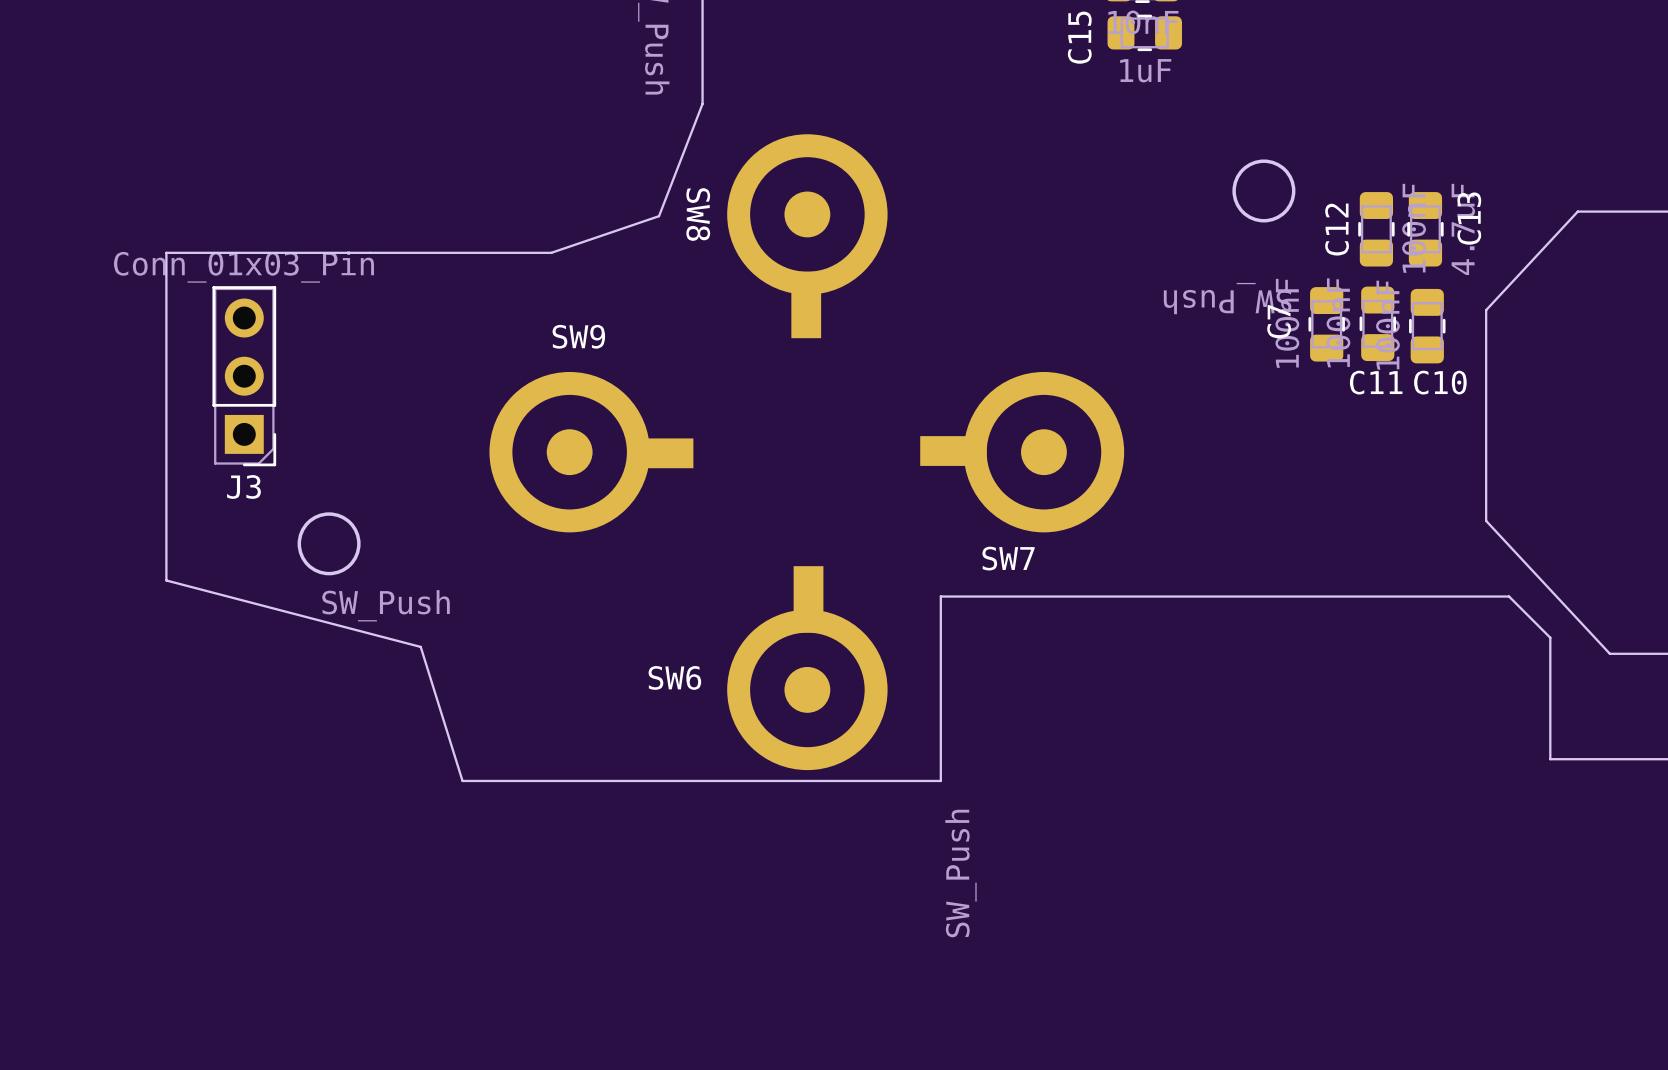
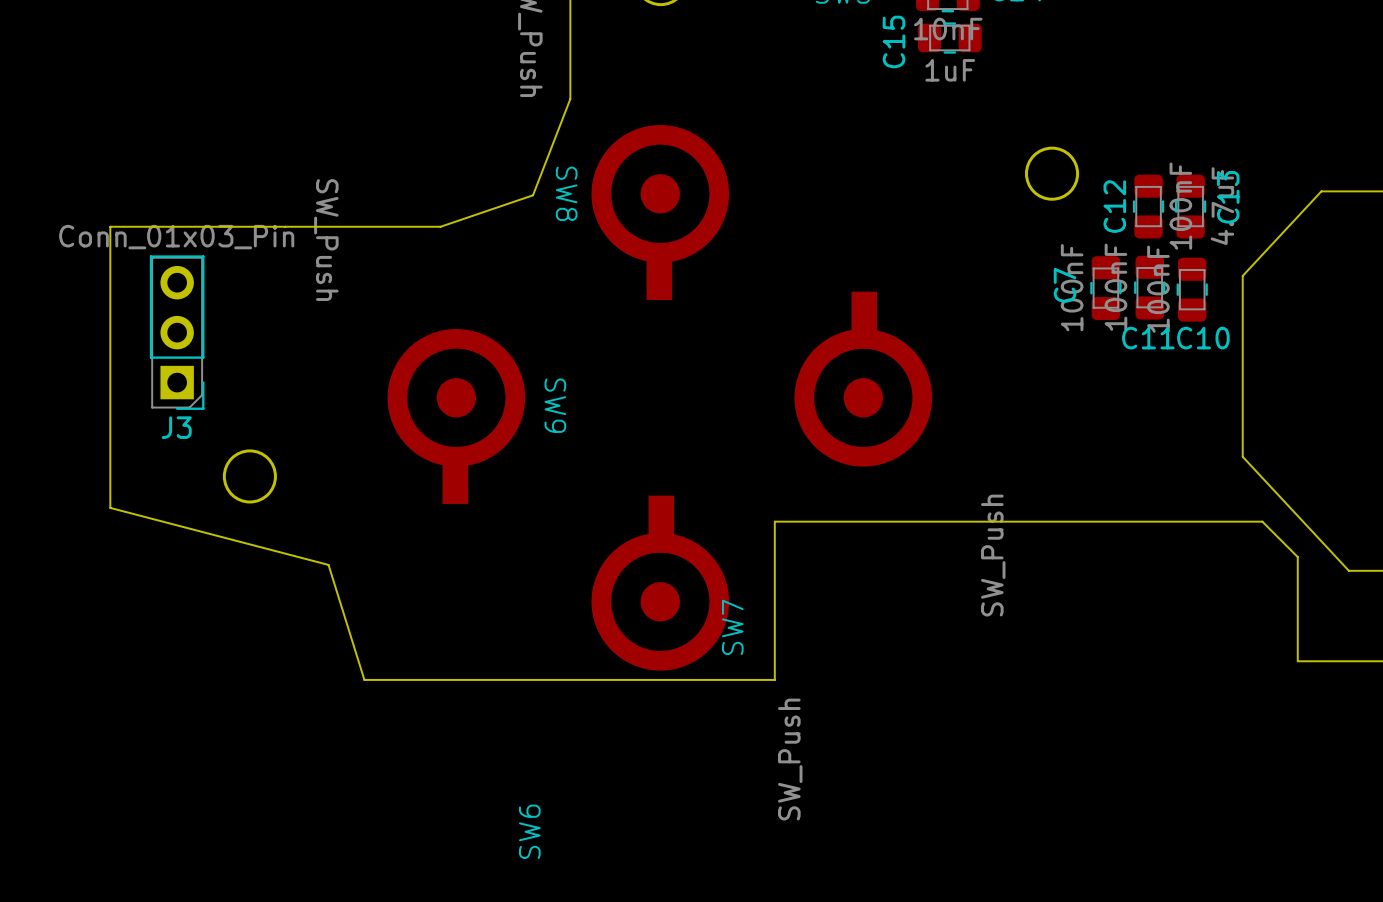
SW9 rotation: 0° (591, 452) -> 90° clockwise (456, 416)
SW7 rotation: 0° (1022, 452) -> 90° clockwise (863, 379)
SW7 name position: SW7 (1008, 558) -> SW7 (732, 627)
SW6 name rotation: 0° (674, 677) -> 90° counterclockwise (529, 831)
SW6 name position: SW6 (674, 677) -> SW6 (529, 831)

